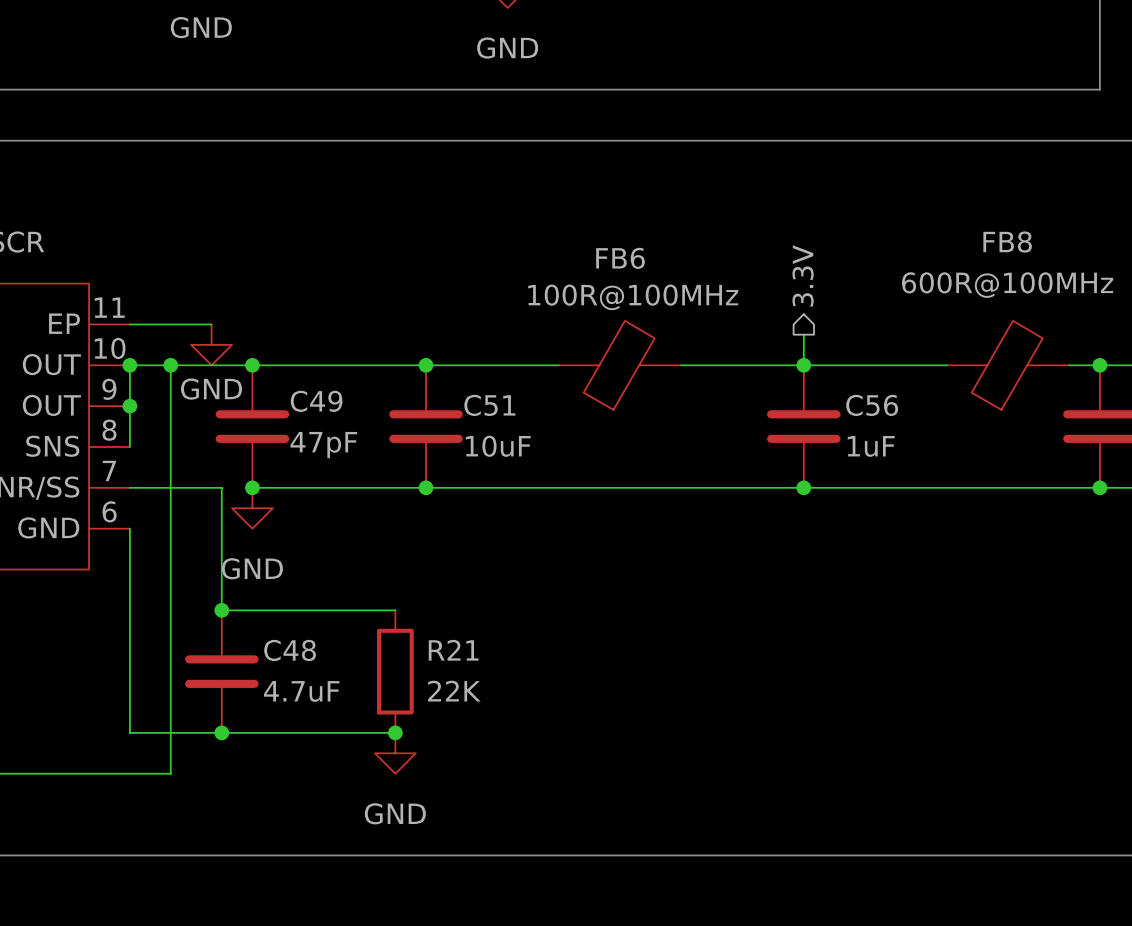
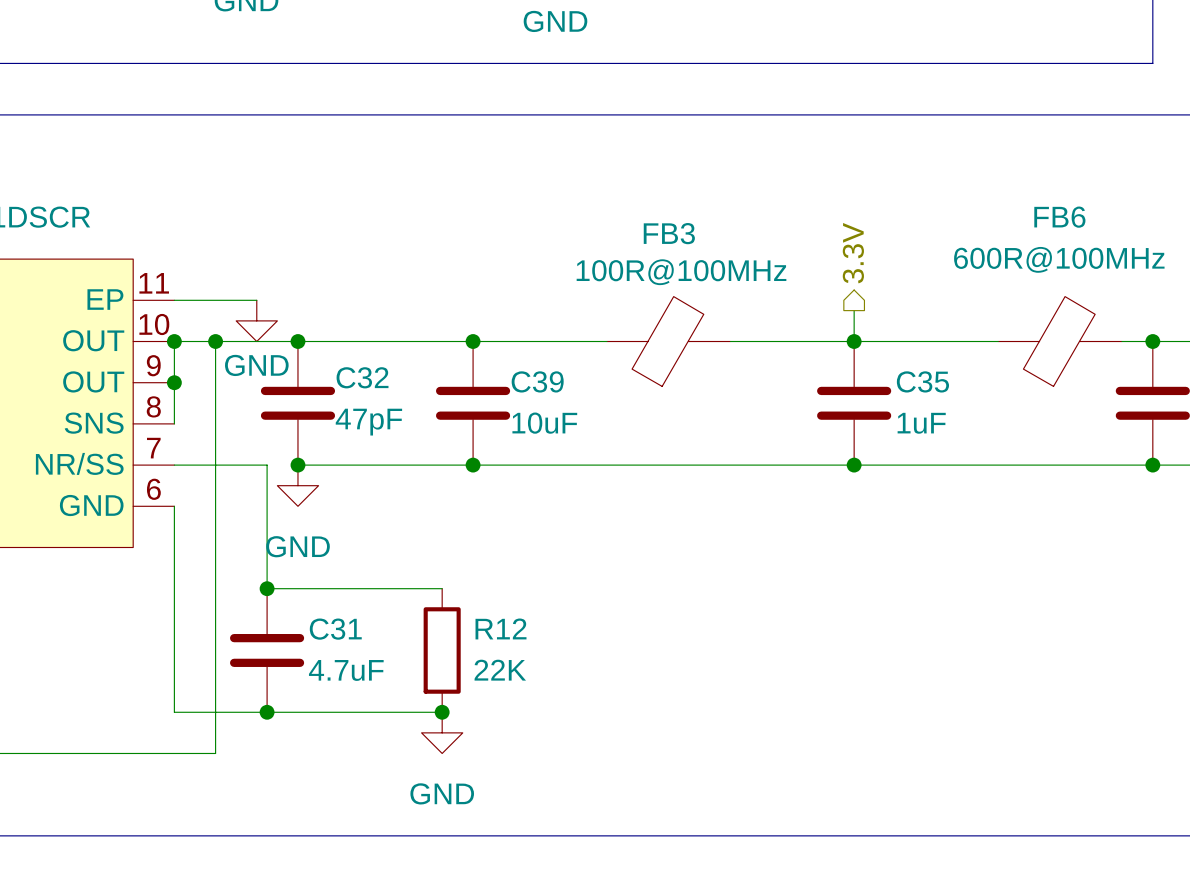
FB8 name: FB8 (1007, 242) -> FB6 (1059, 217)
FB6 name: FB6 (620, 258) -> FB3 (669, 233)
C49 name: C49 (316, 401) -> C32 (362, 377)
C51 name: C51 (489, 405) -> C39 (537, 381)
C56 name: C56 (872, 405) -> C35 (922, 381)
C48 name: C48 (290, 650) -> C31 (335, 629)
R21 name: R21 (453, 650) -> R12 (501, 628)

